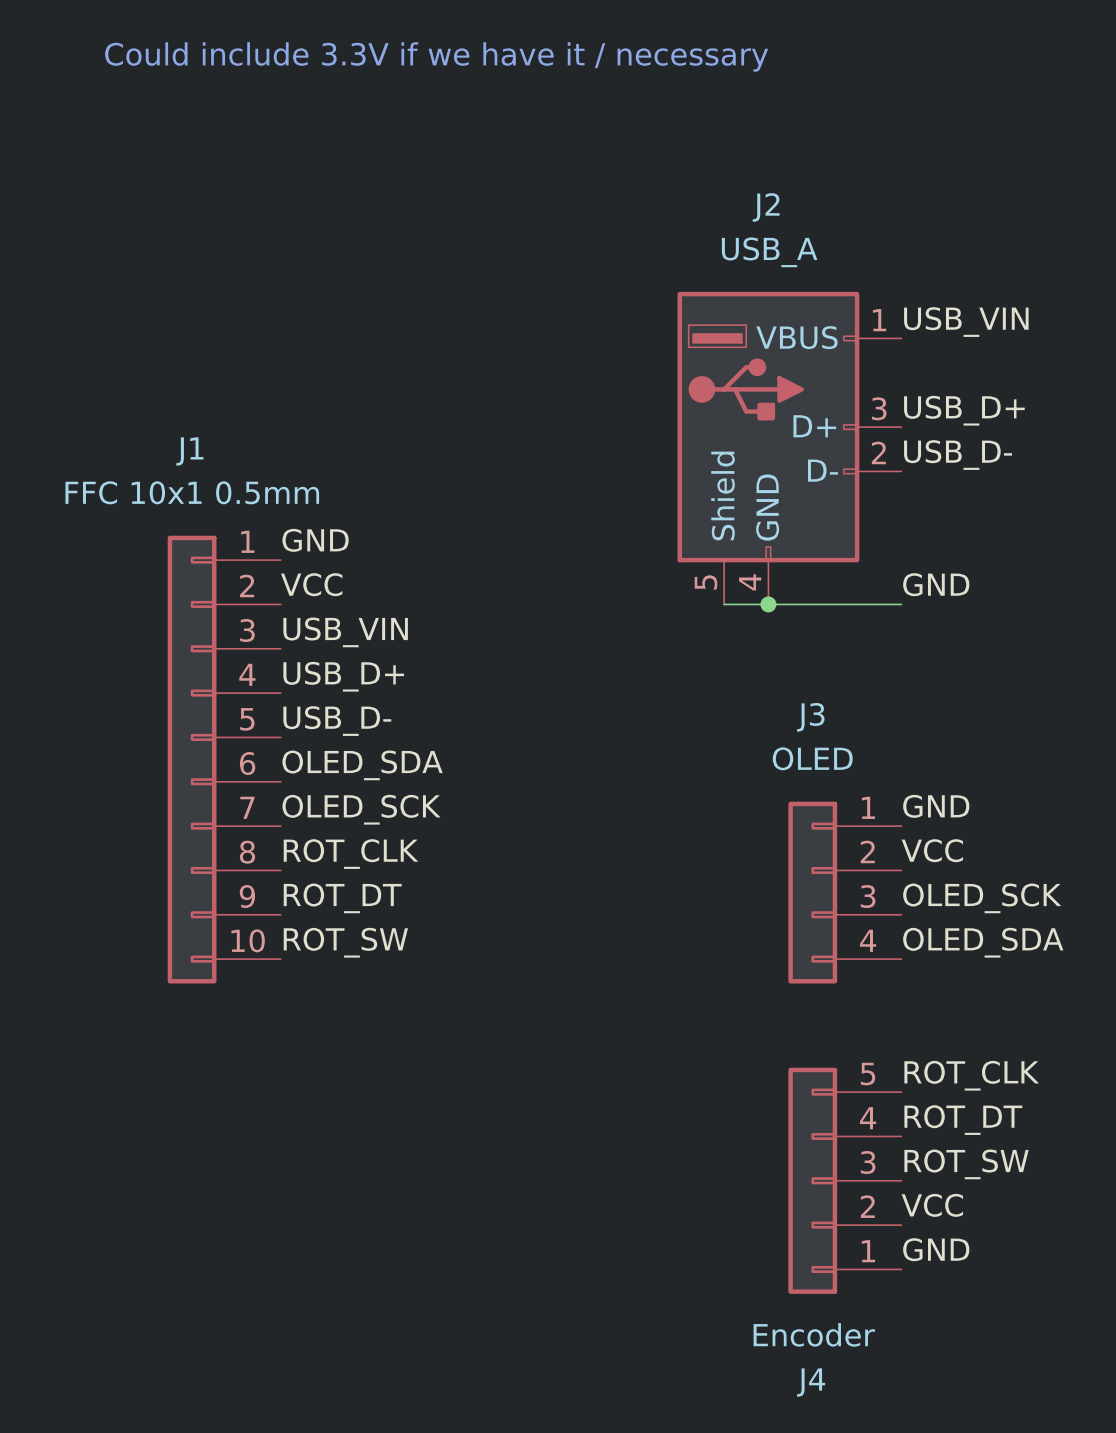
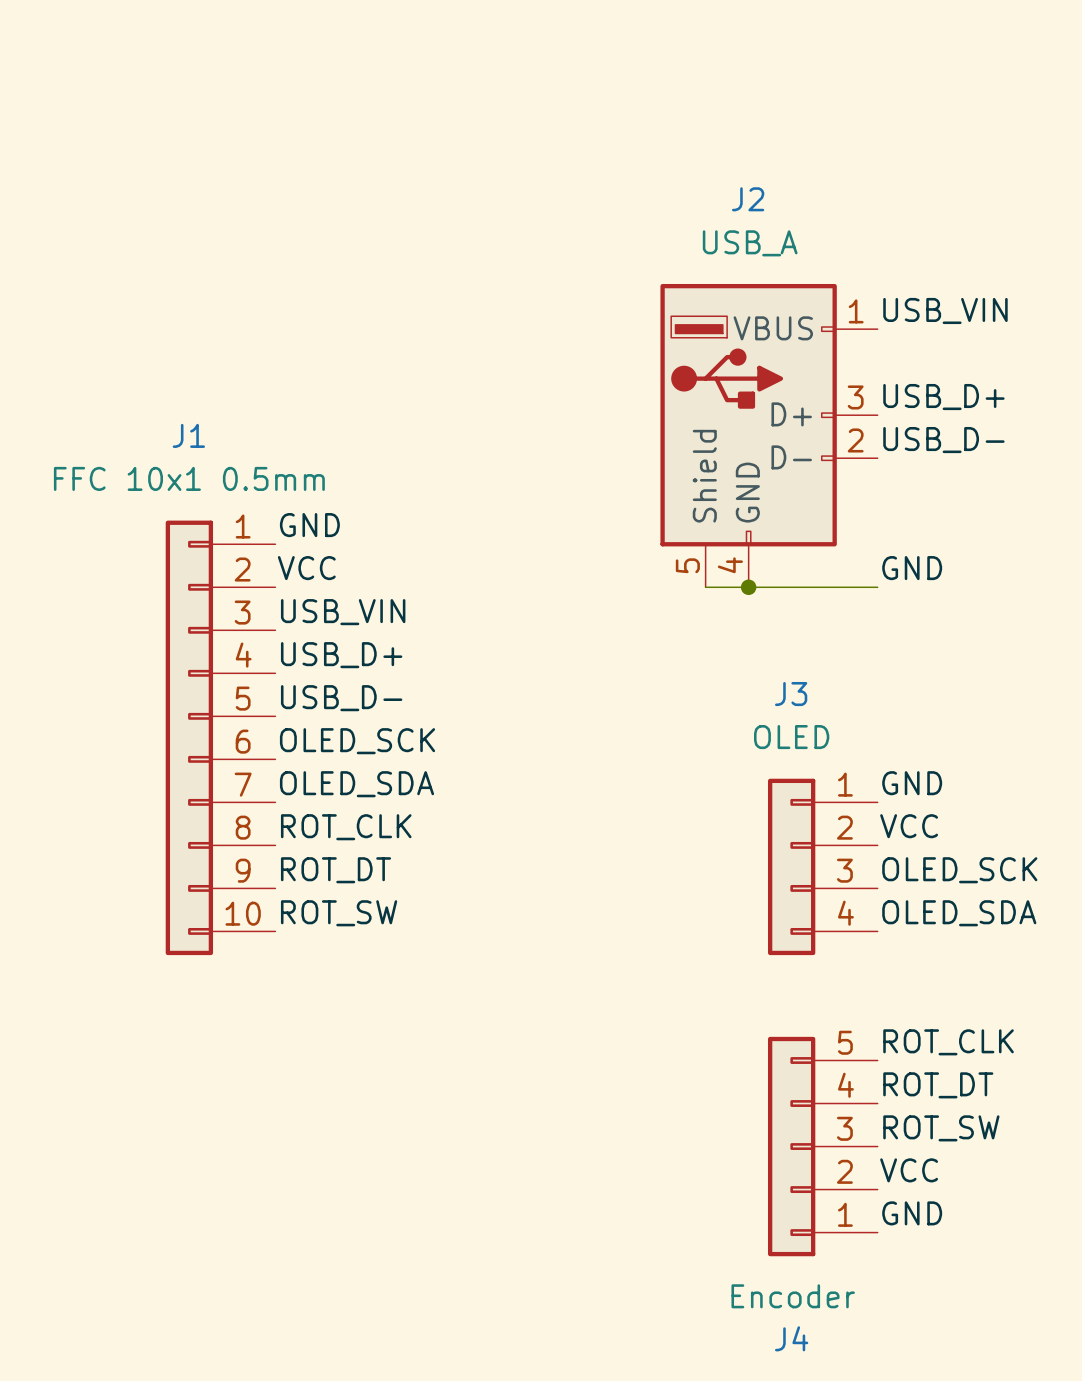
text: Could include 3.3V if we have it / necessary (436, 56) -> none
label: OLED_SDA (362, 765) -> OLED_SCK (357, 741)
label: OLED_SCK (361, 809) -> OLED_SDA (357, 784)

